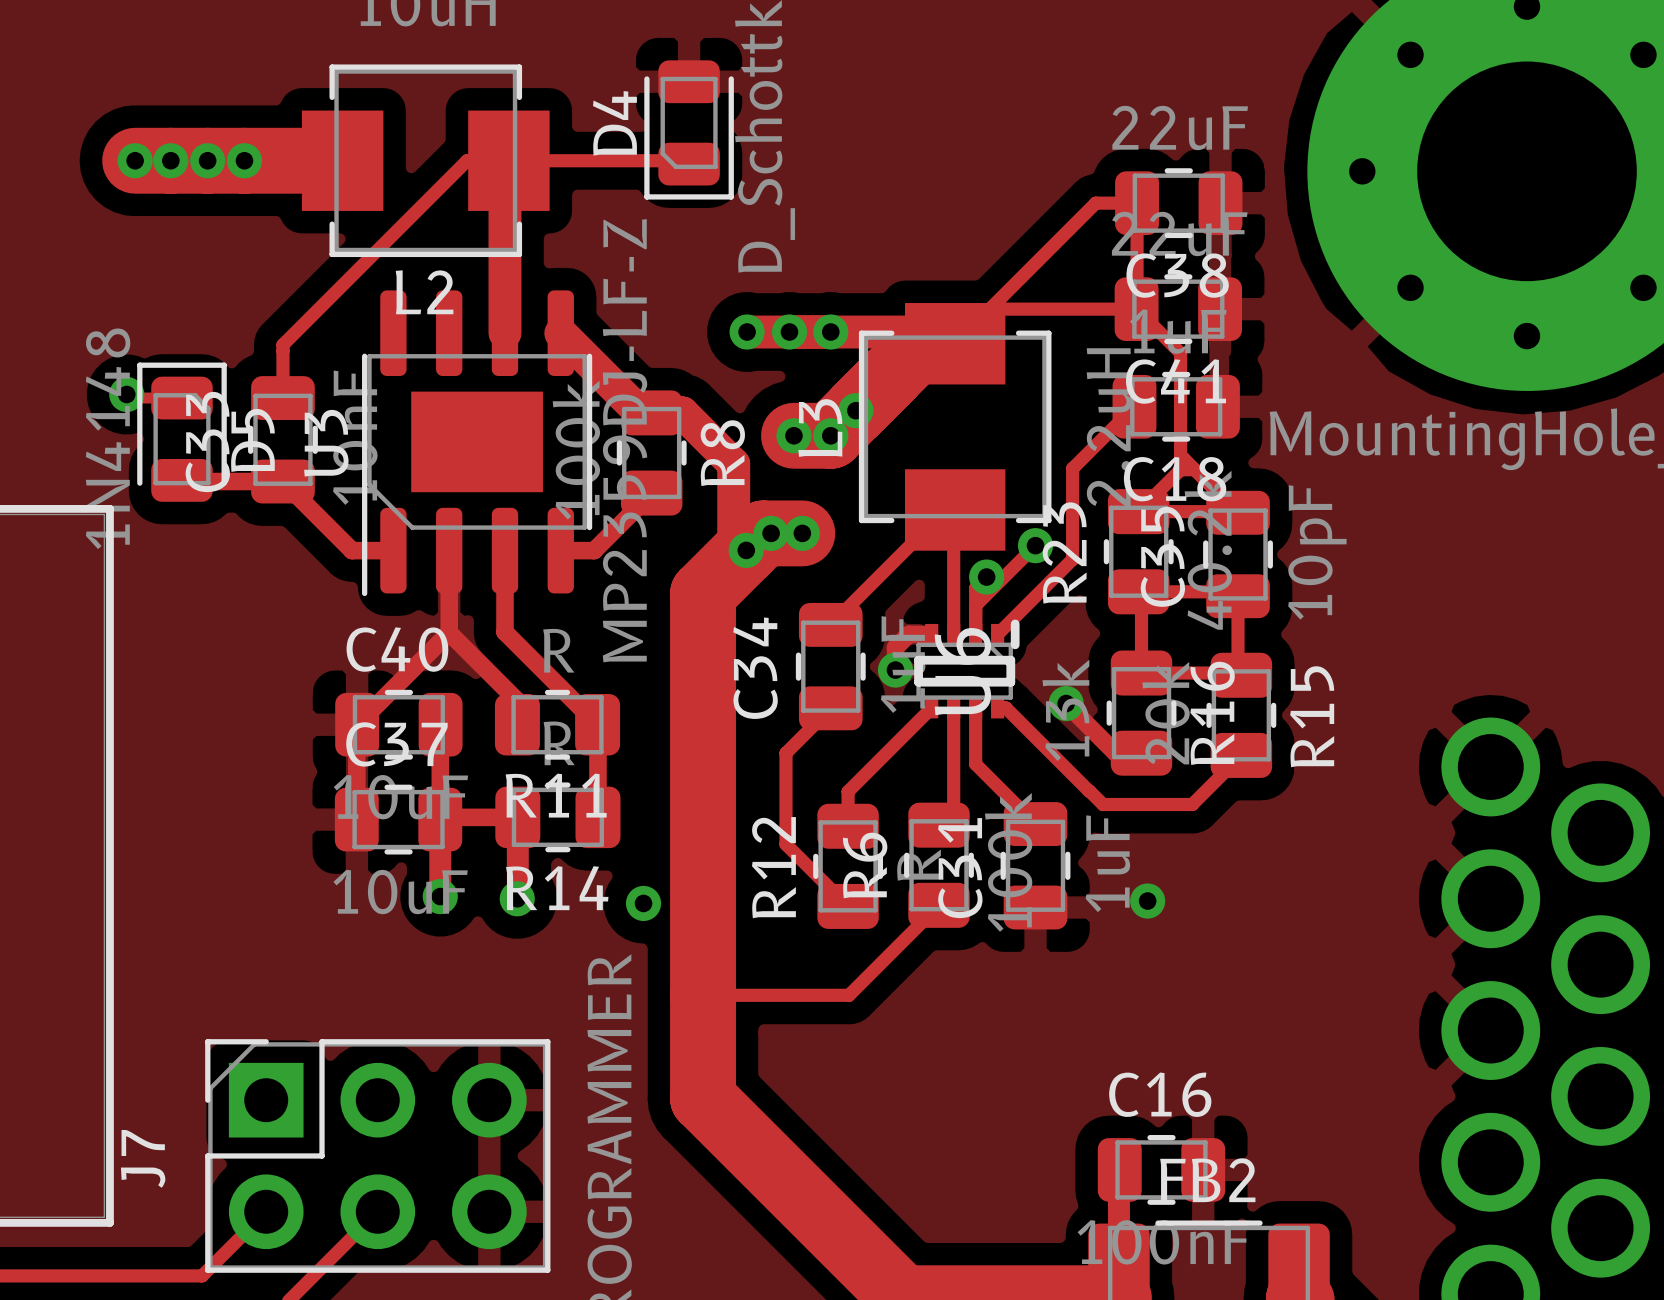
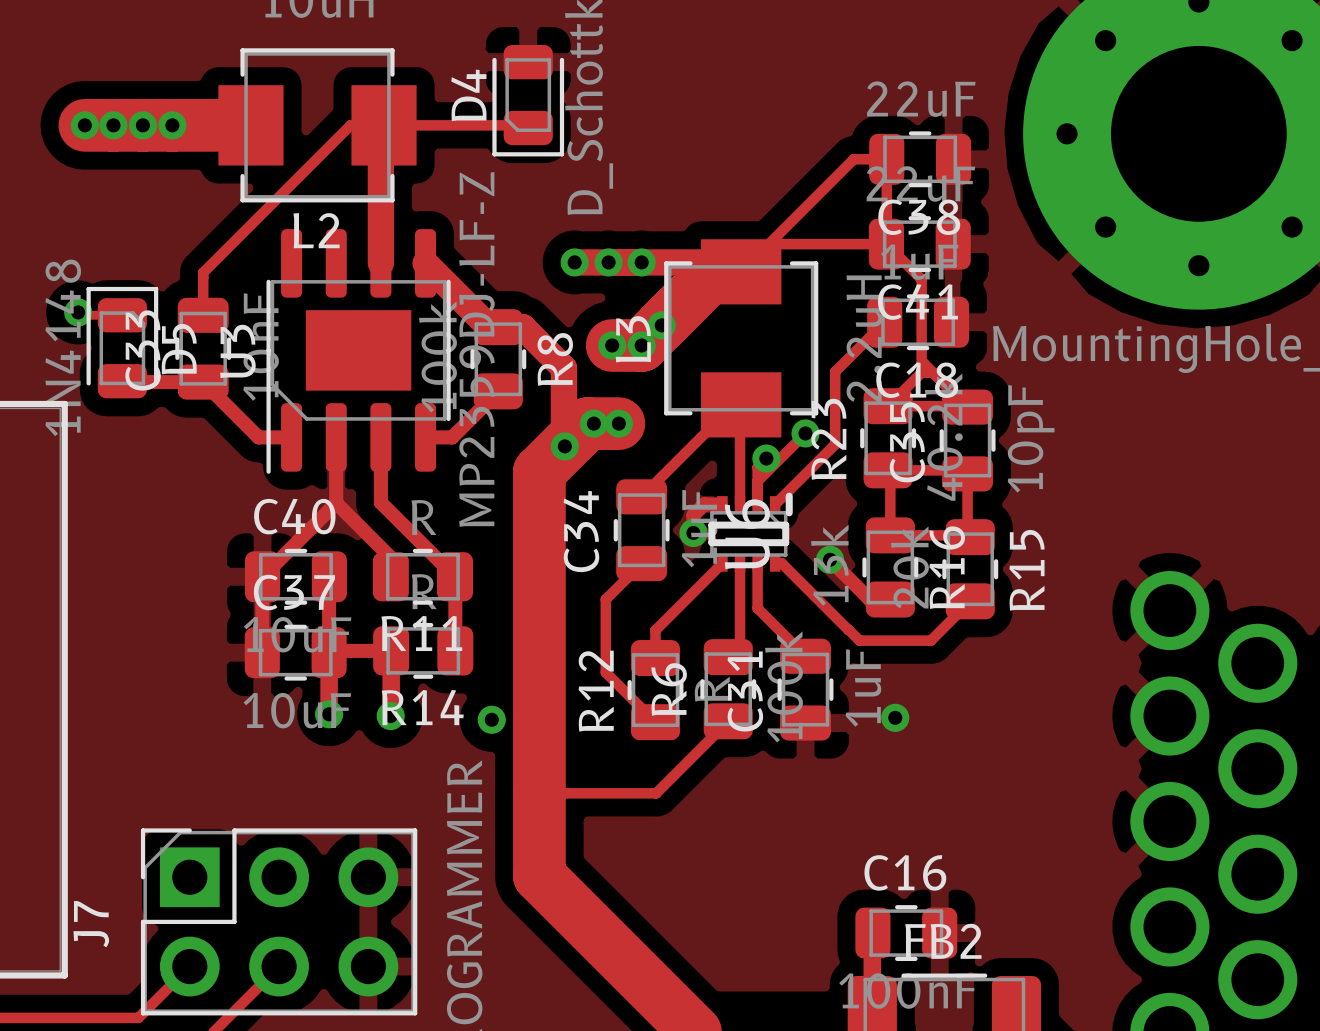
via position: (746, 550) -> (564, 446)

